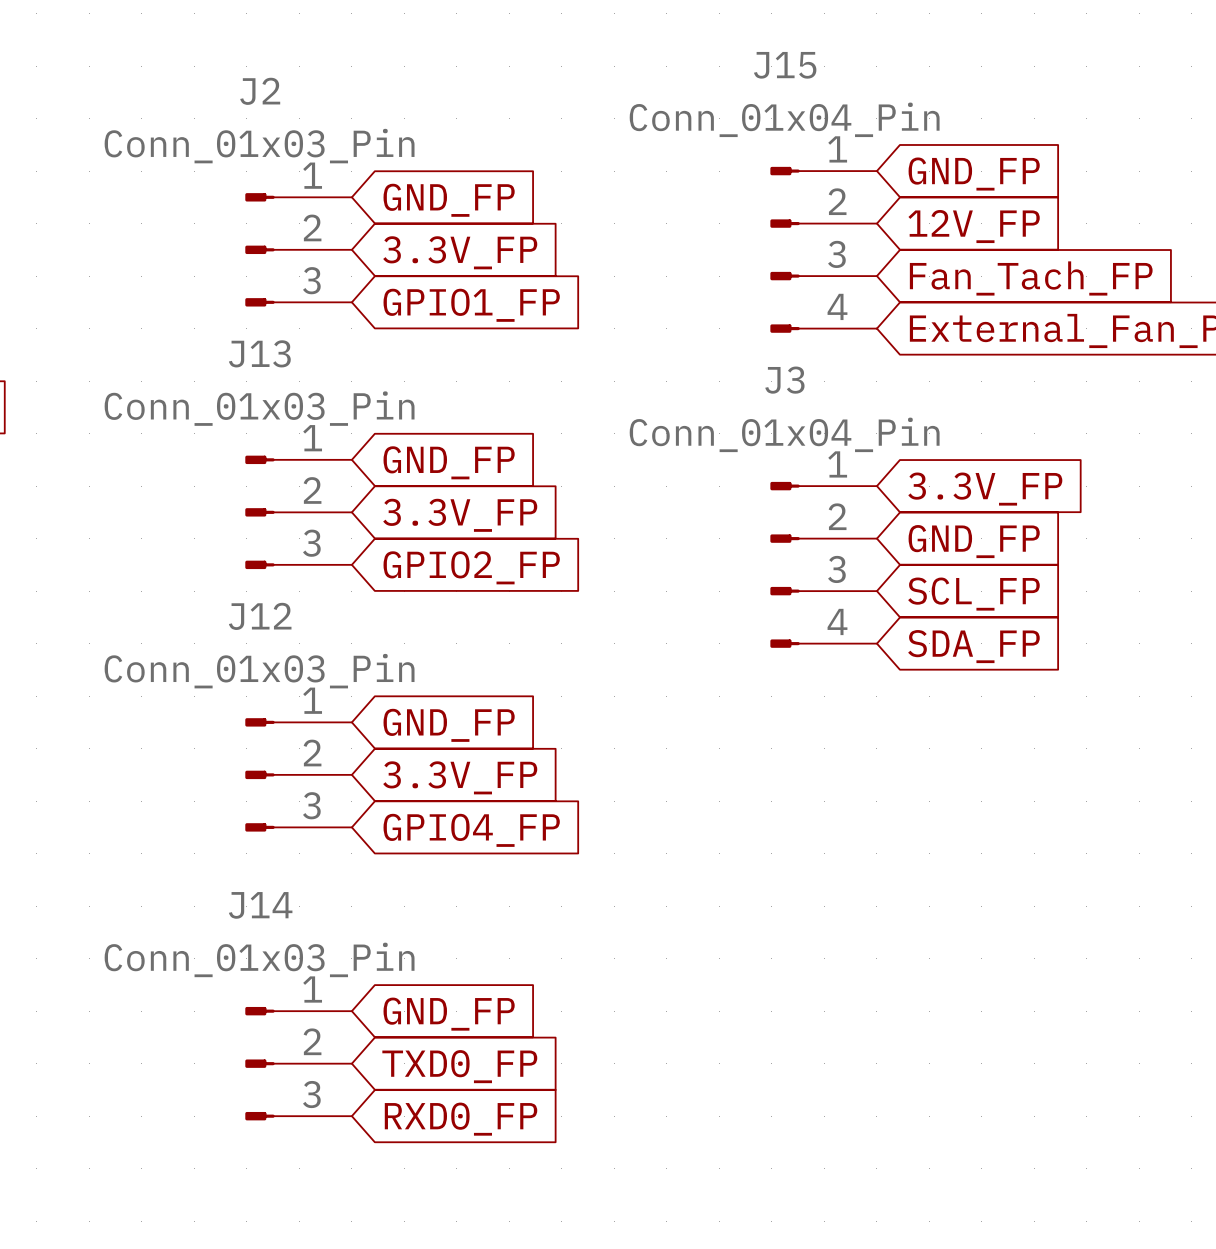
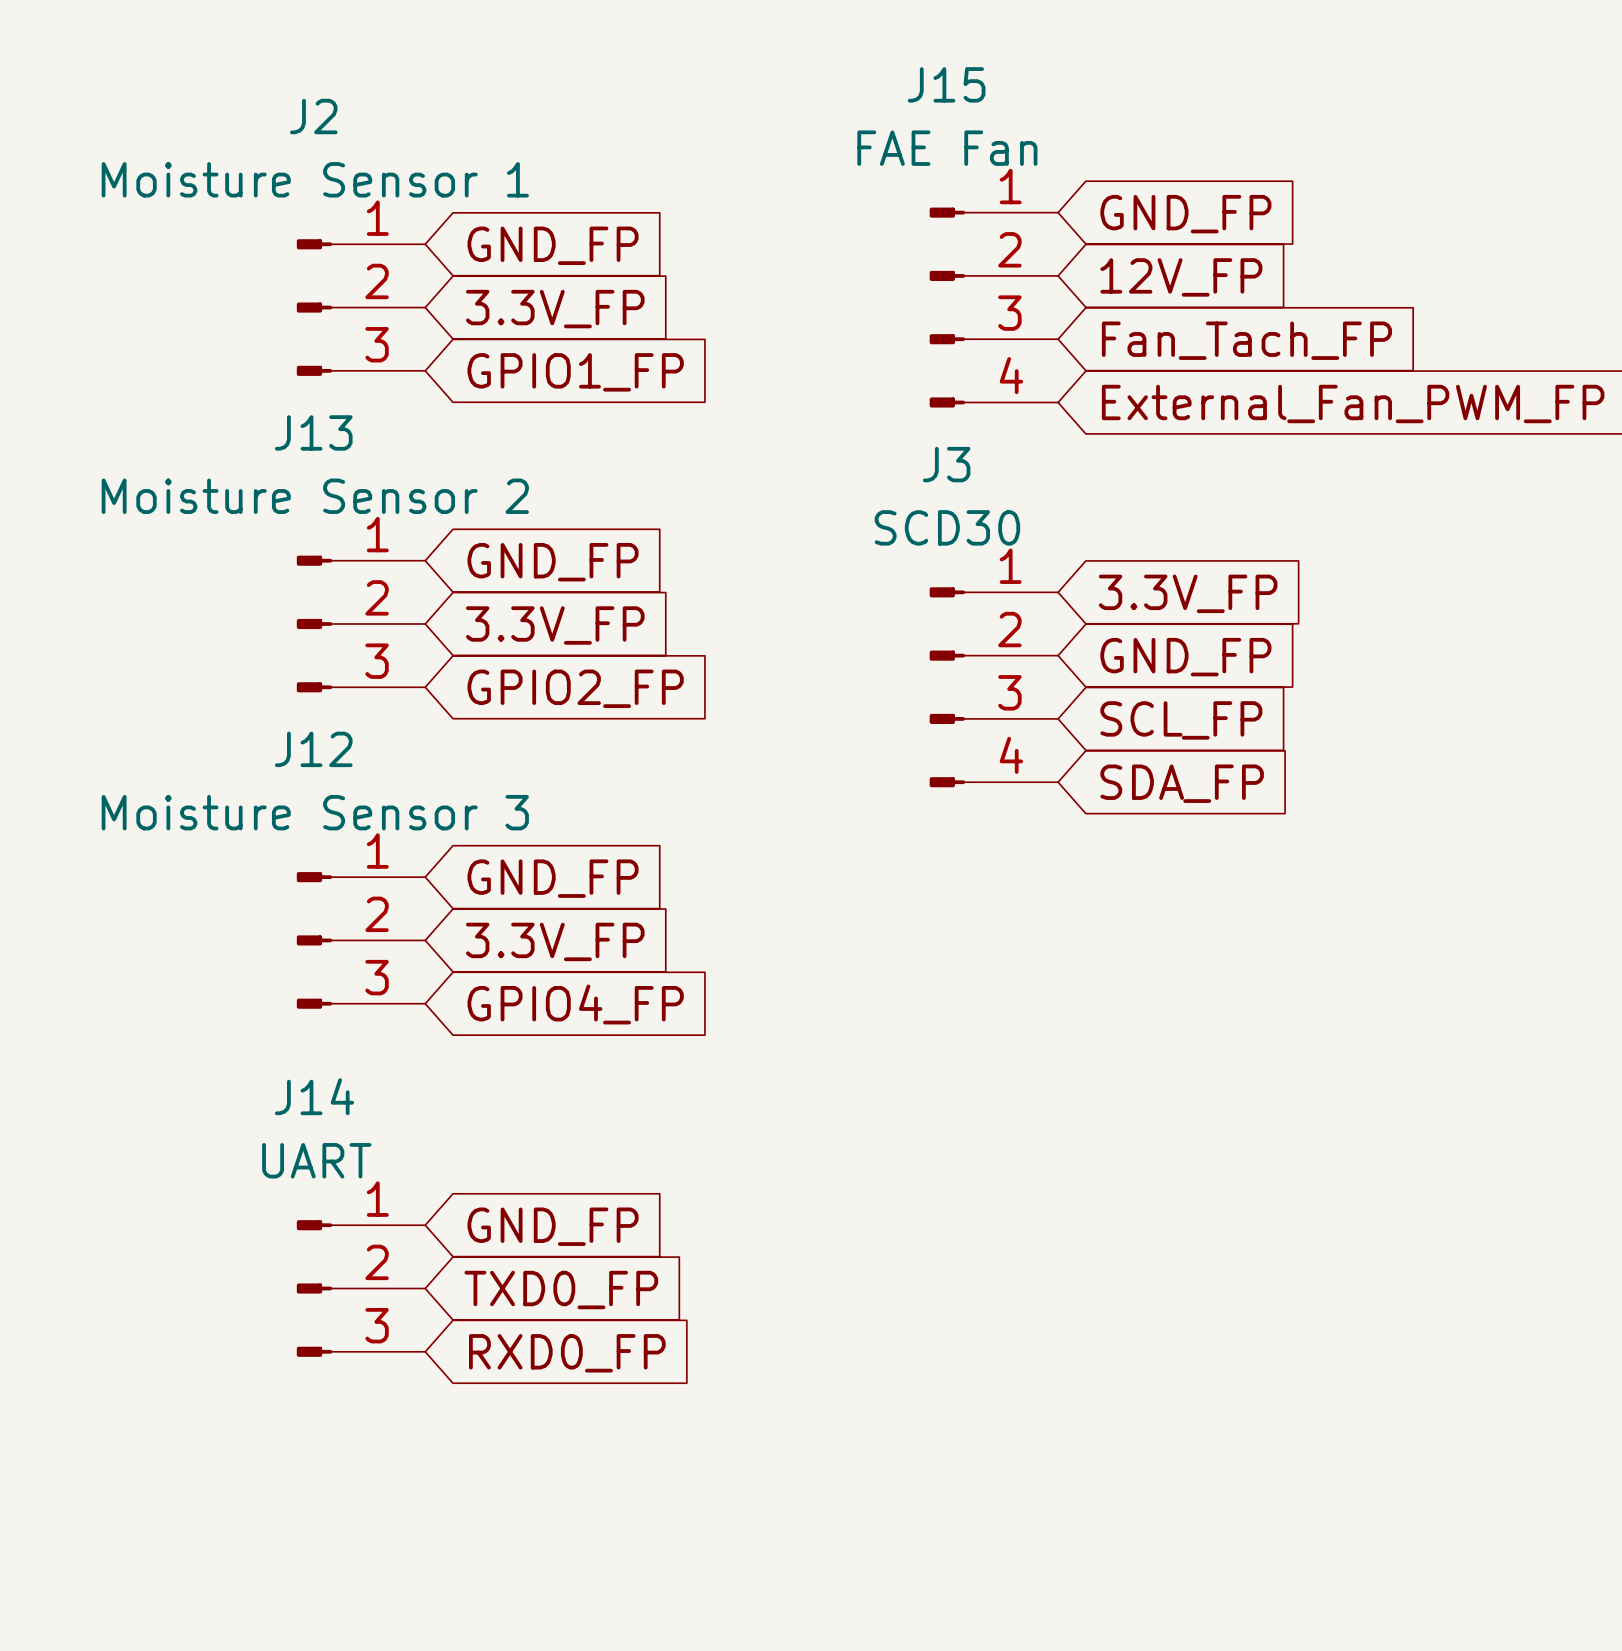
J15 value: Conn_01x04_Pin (784, 119) -> FAE Fan (947, 148)
J2 value: Conn_01x03_Pin (259, 146) -> Moisture Sensor 1 (315, 179)
J13 value: Conn_01x03_Pin (259, 408) -> Moisture Sensor 2 (315, 496)
J3 value: Conn_01x04_Pin (784, 434) -> SCD30 (947, 527)
J12 value: Conn_01x03_Pin (259, 671) -> Moisture Sensor 3 (315, 812)
J14 value: Conn_01x03_Pin (259, 959) -> UART (316, 1160)

